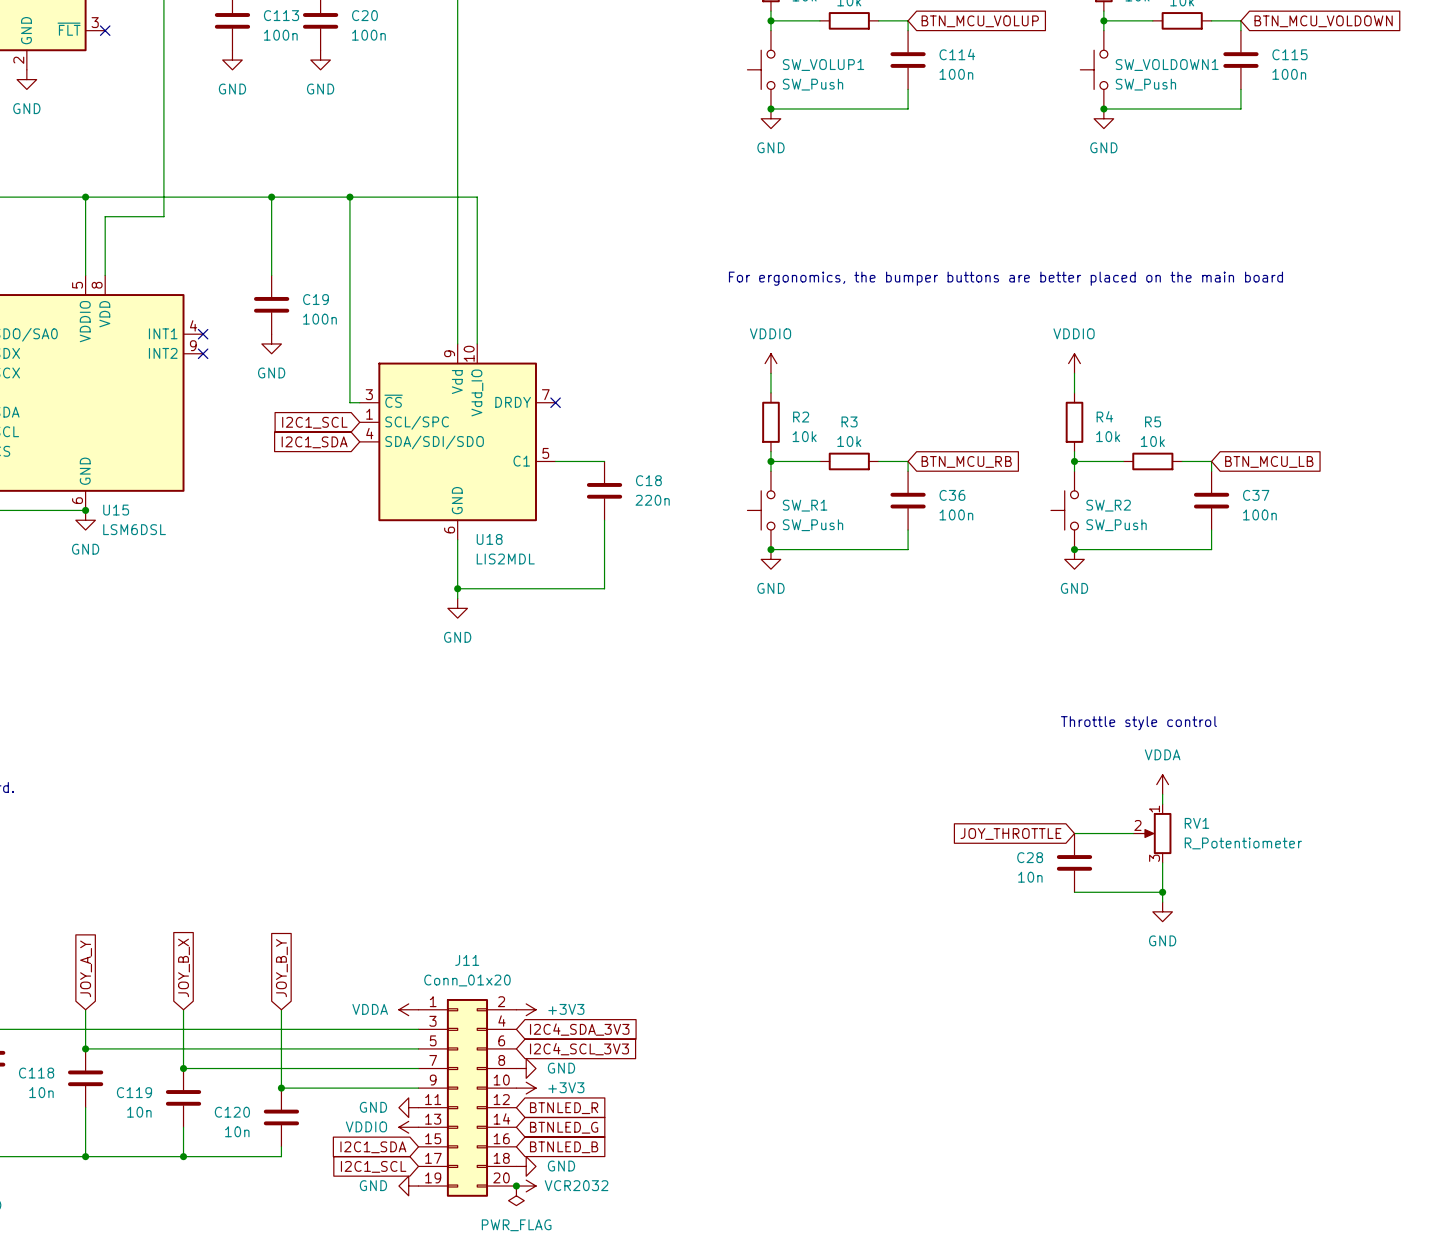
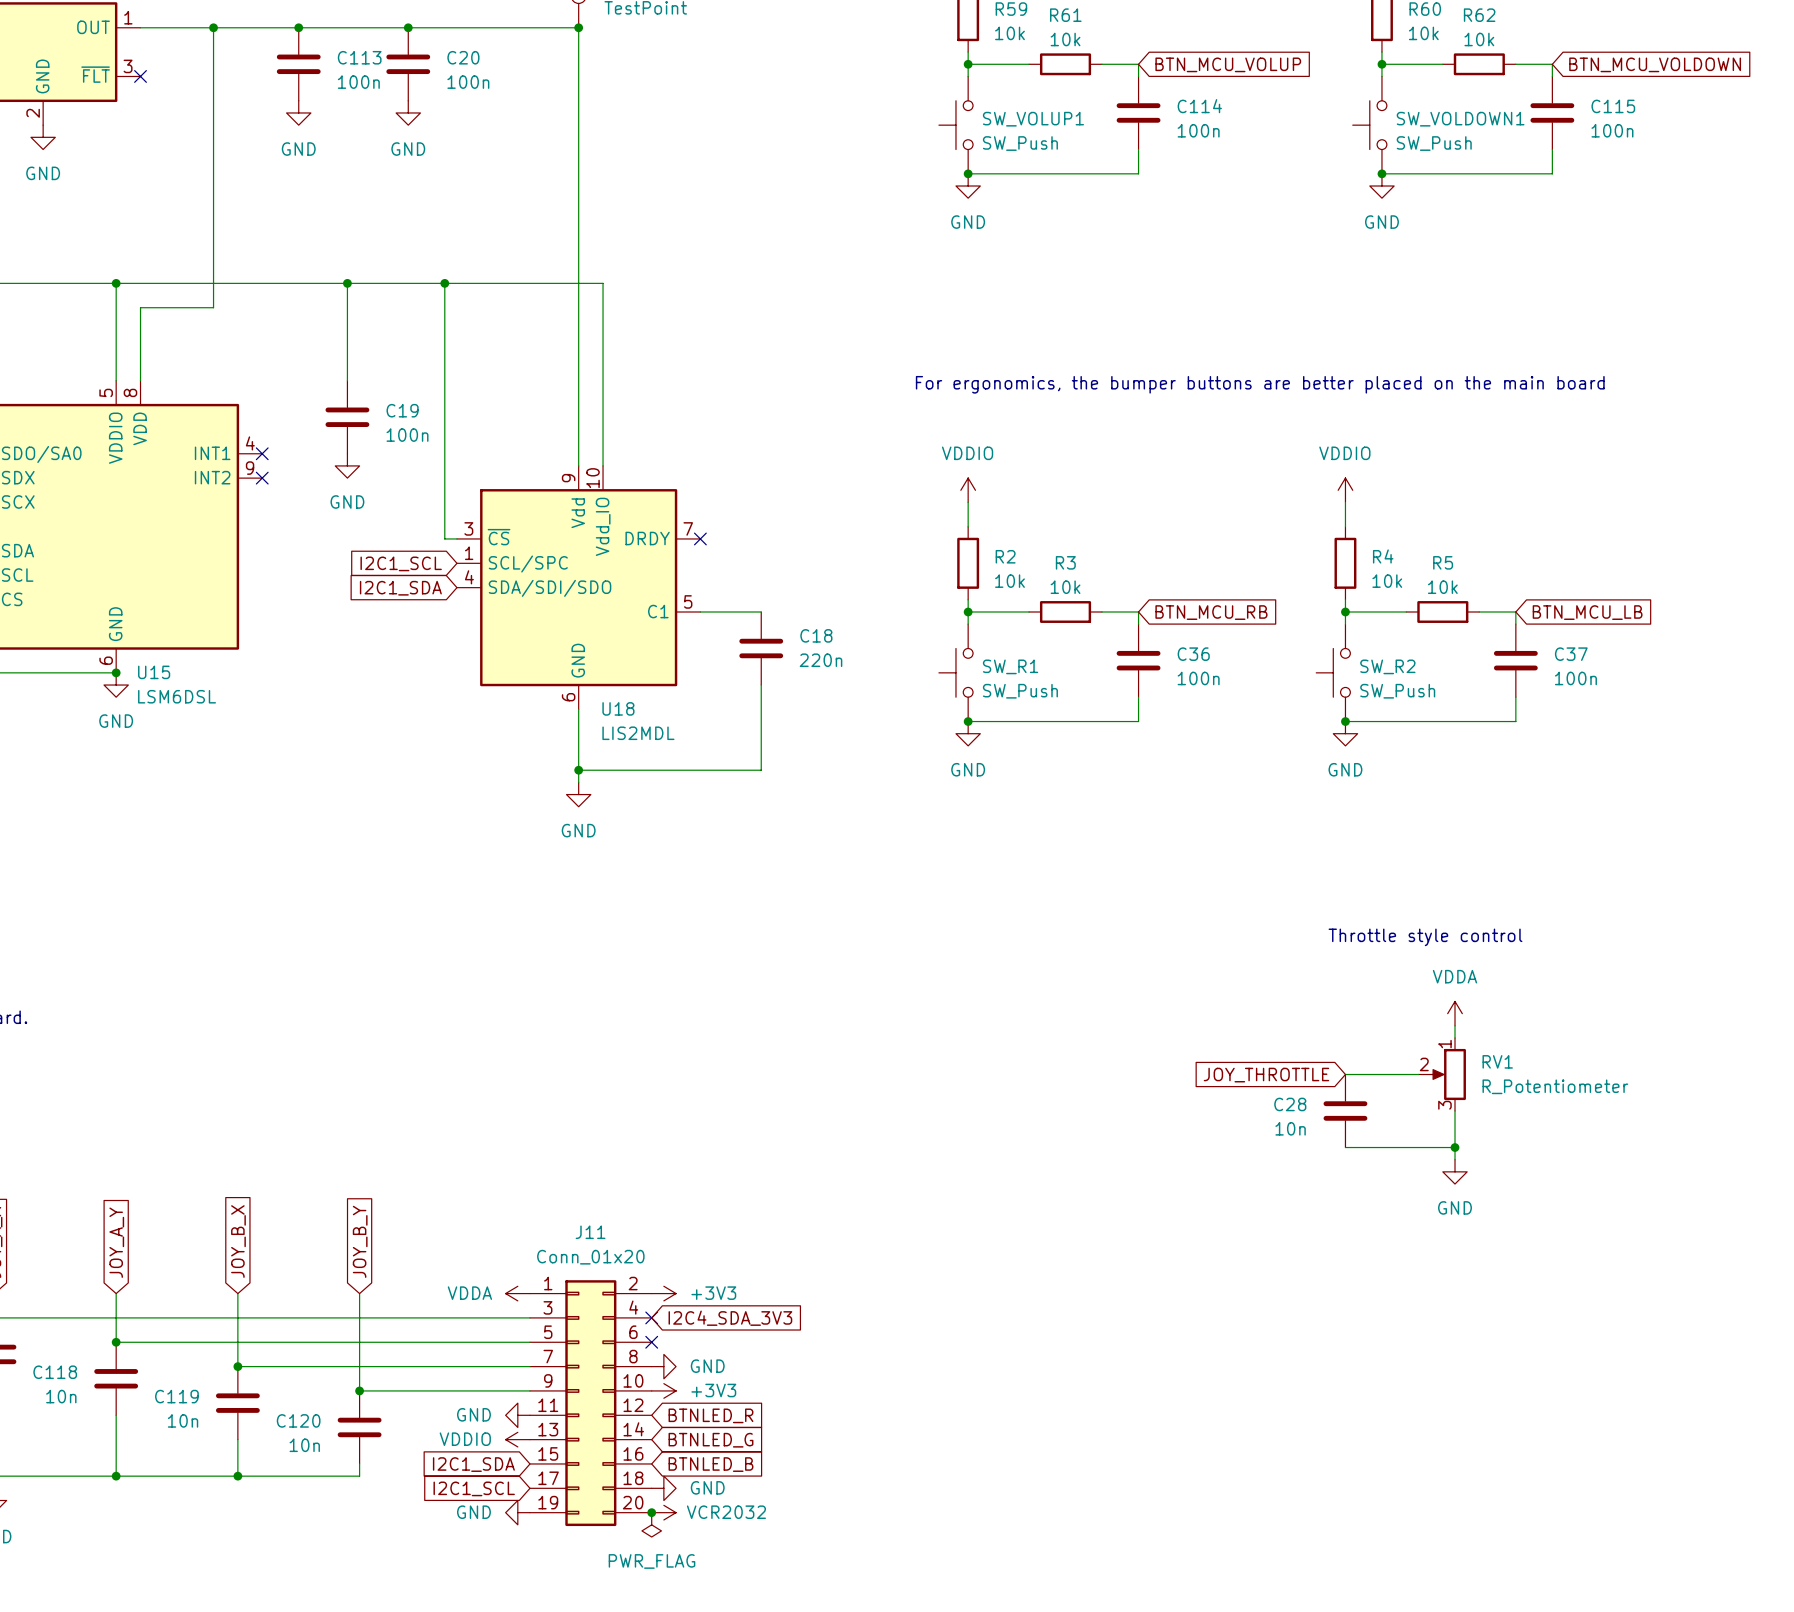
no-connect mark: none -> (651, 1317)
no-connect mark: none -> (651, 1342)
global label: I2C4_SCL_3V3 (579, 1049) -> none

